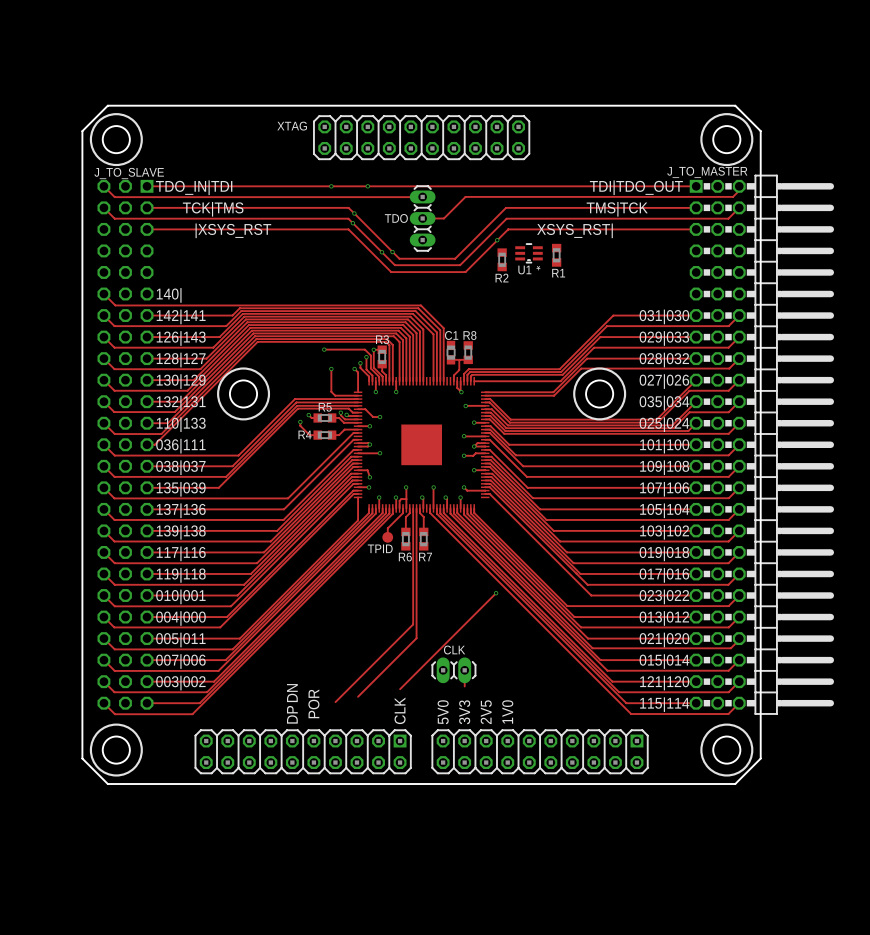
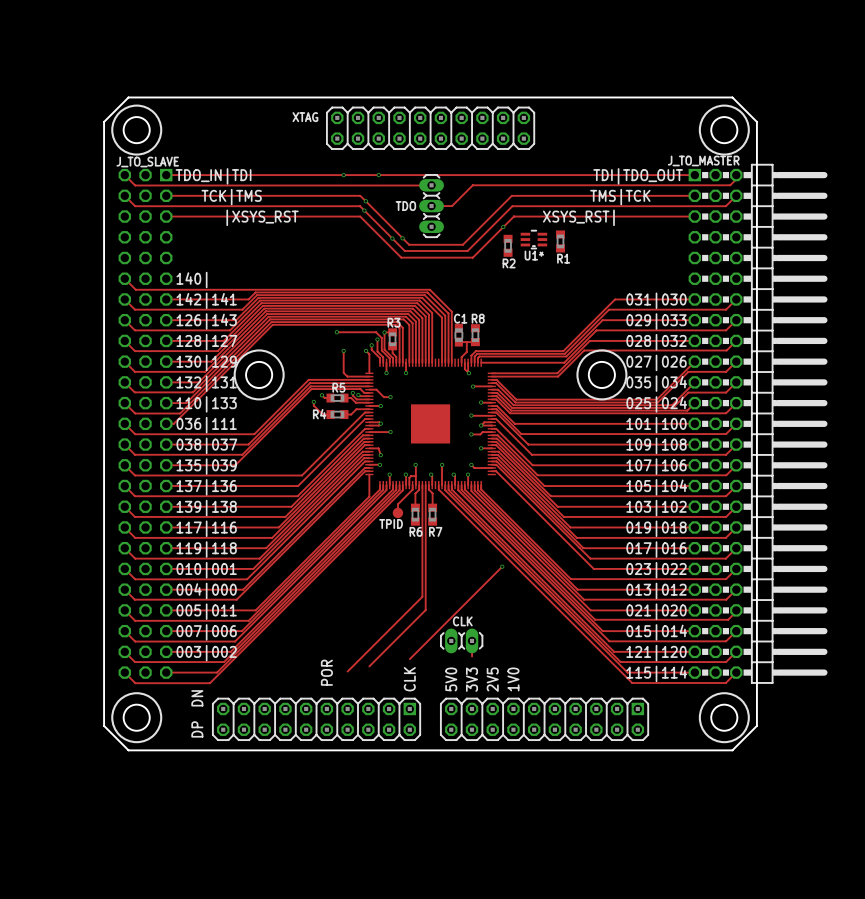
text position: DN (292, 693) -> DN (197, 698)
text position: DP (292, 714) -> DP (197, 729)

